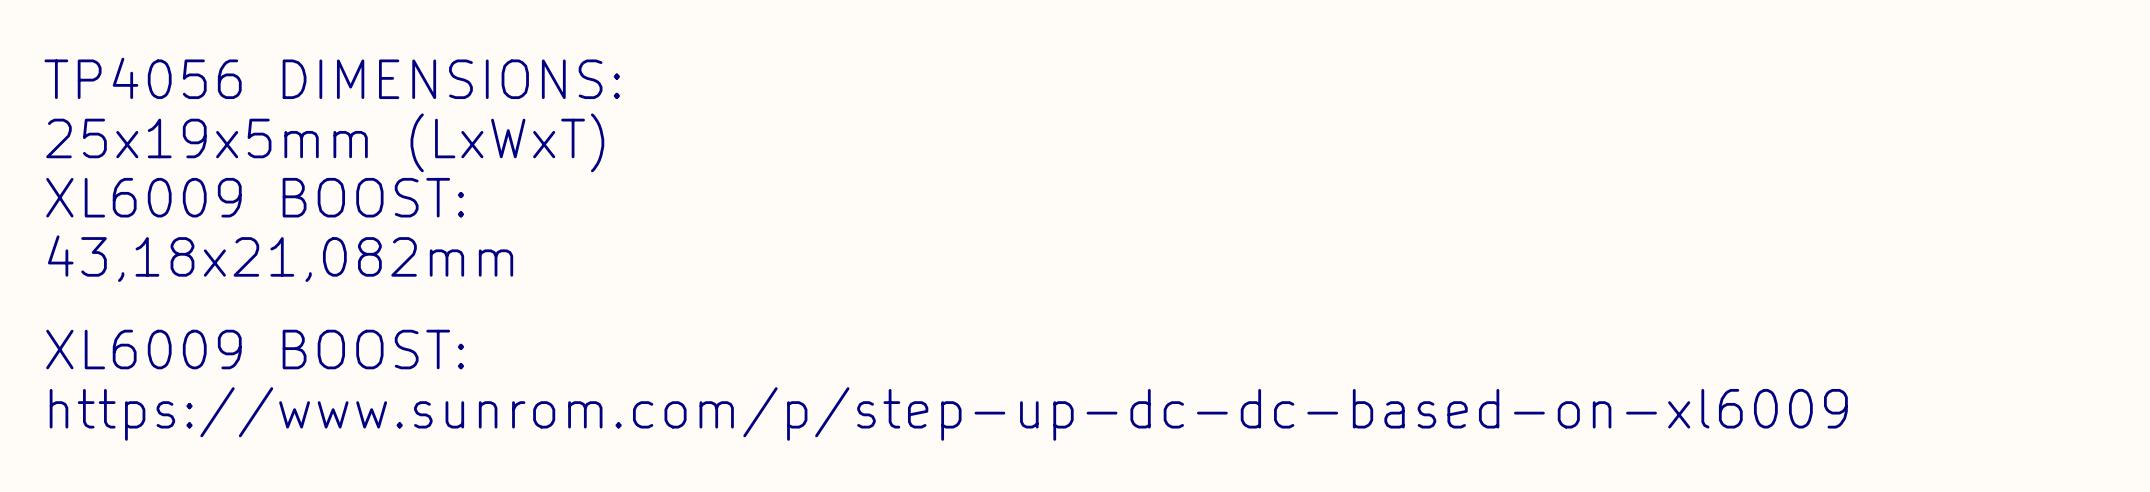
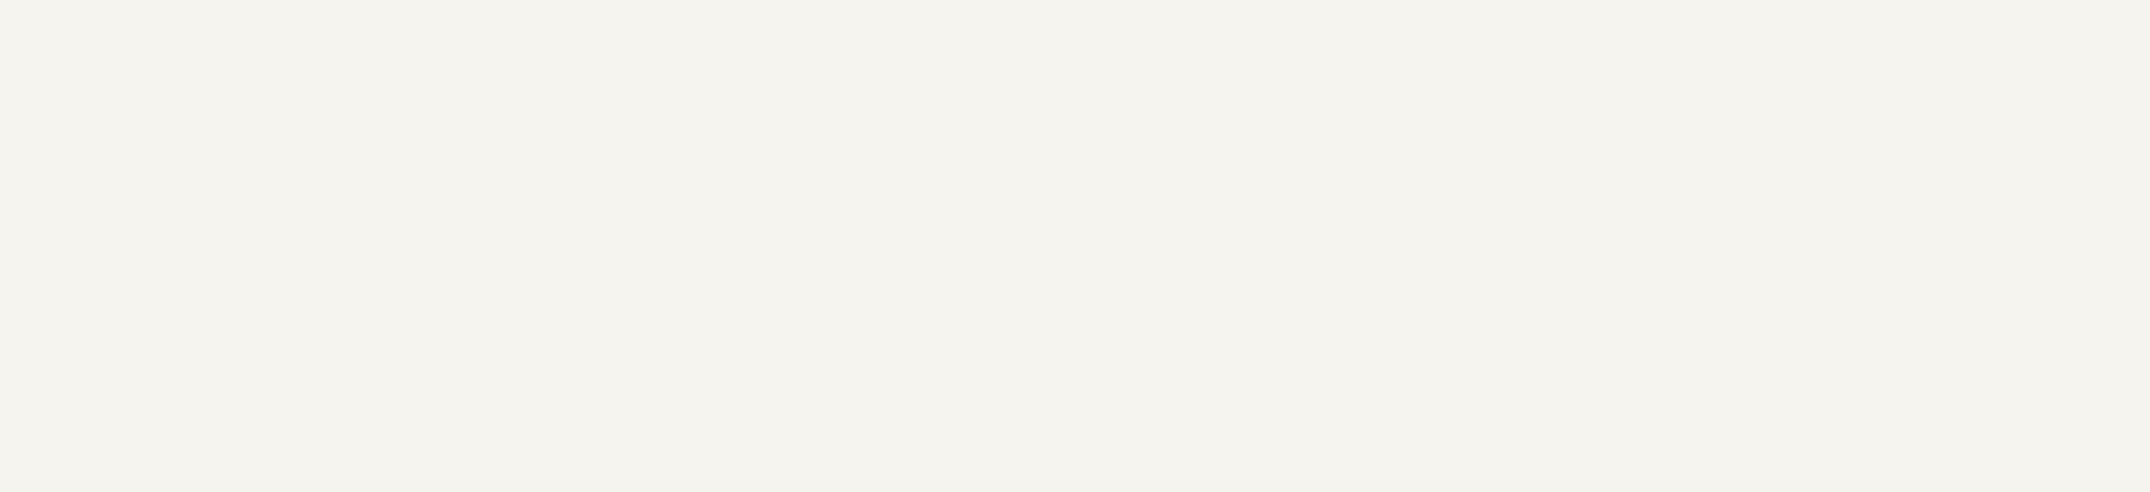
text: TP4056 DIMENSIONS: (332, 78) -> none
text: 25x19x5mm (LxWxT) (325, 142) -> none
text: XL6009 BOOST: (255, 197) -> none
text: 43,18x21,082mm (280, 258) -> none
text: XL6009 BOOST: (255, 349) -> none
text: https://www.sunrom.com/p/step-up-dc-dc-based-on-xl6009 (948, 413) -> none

